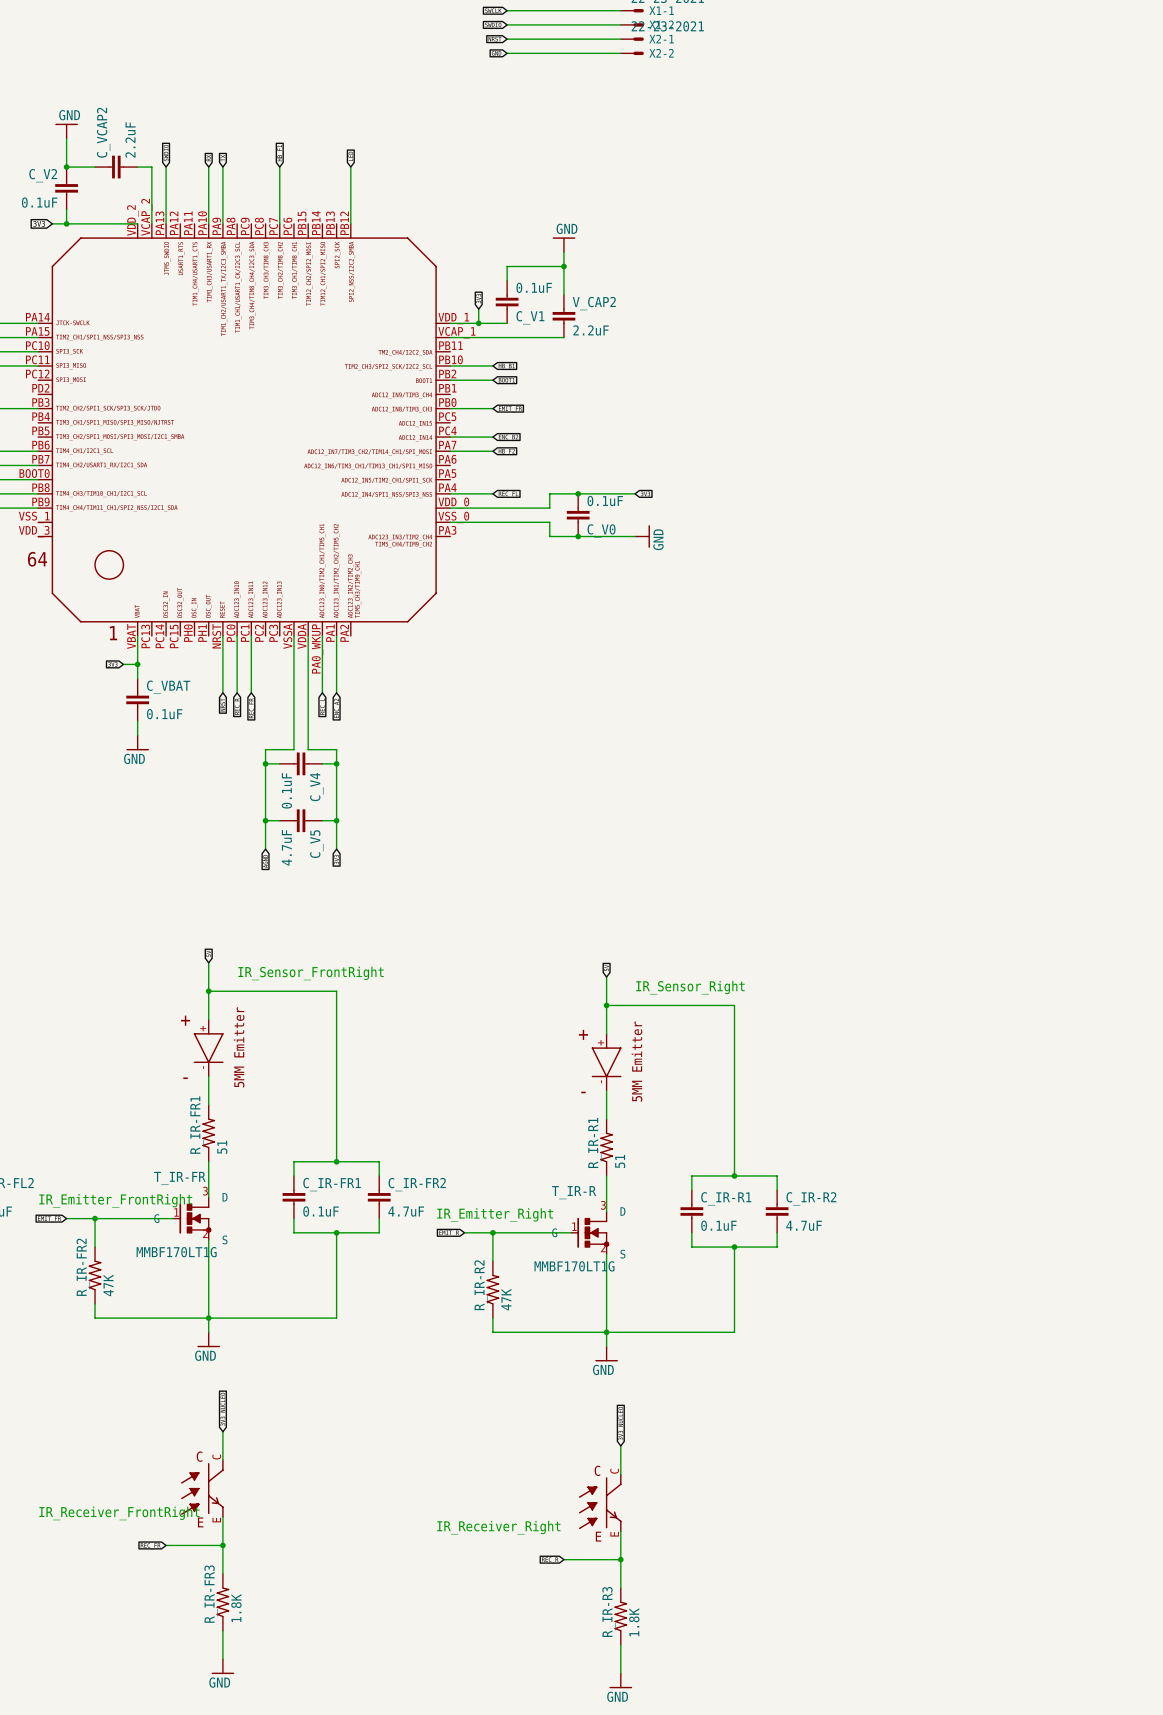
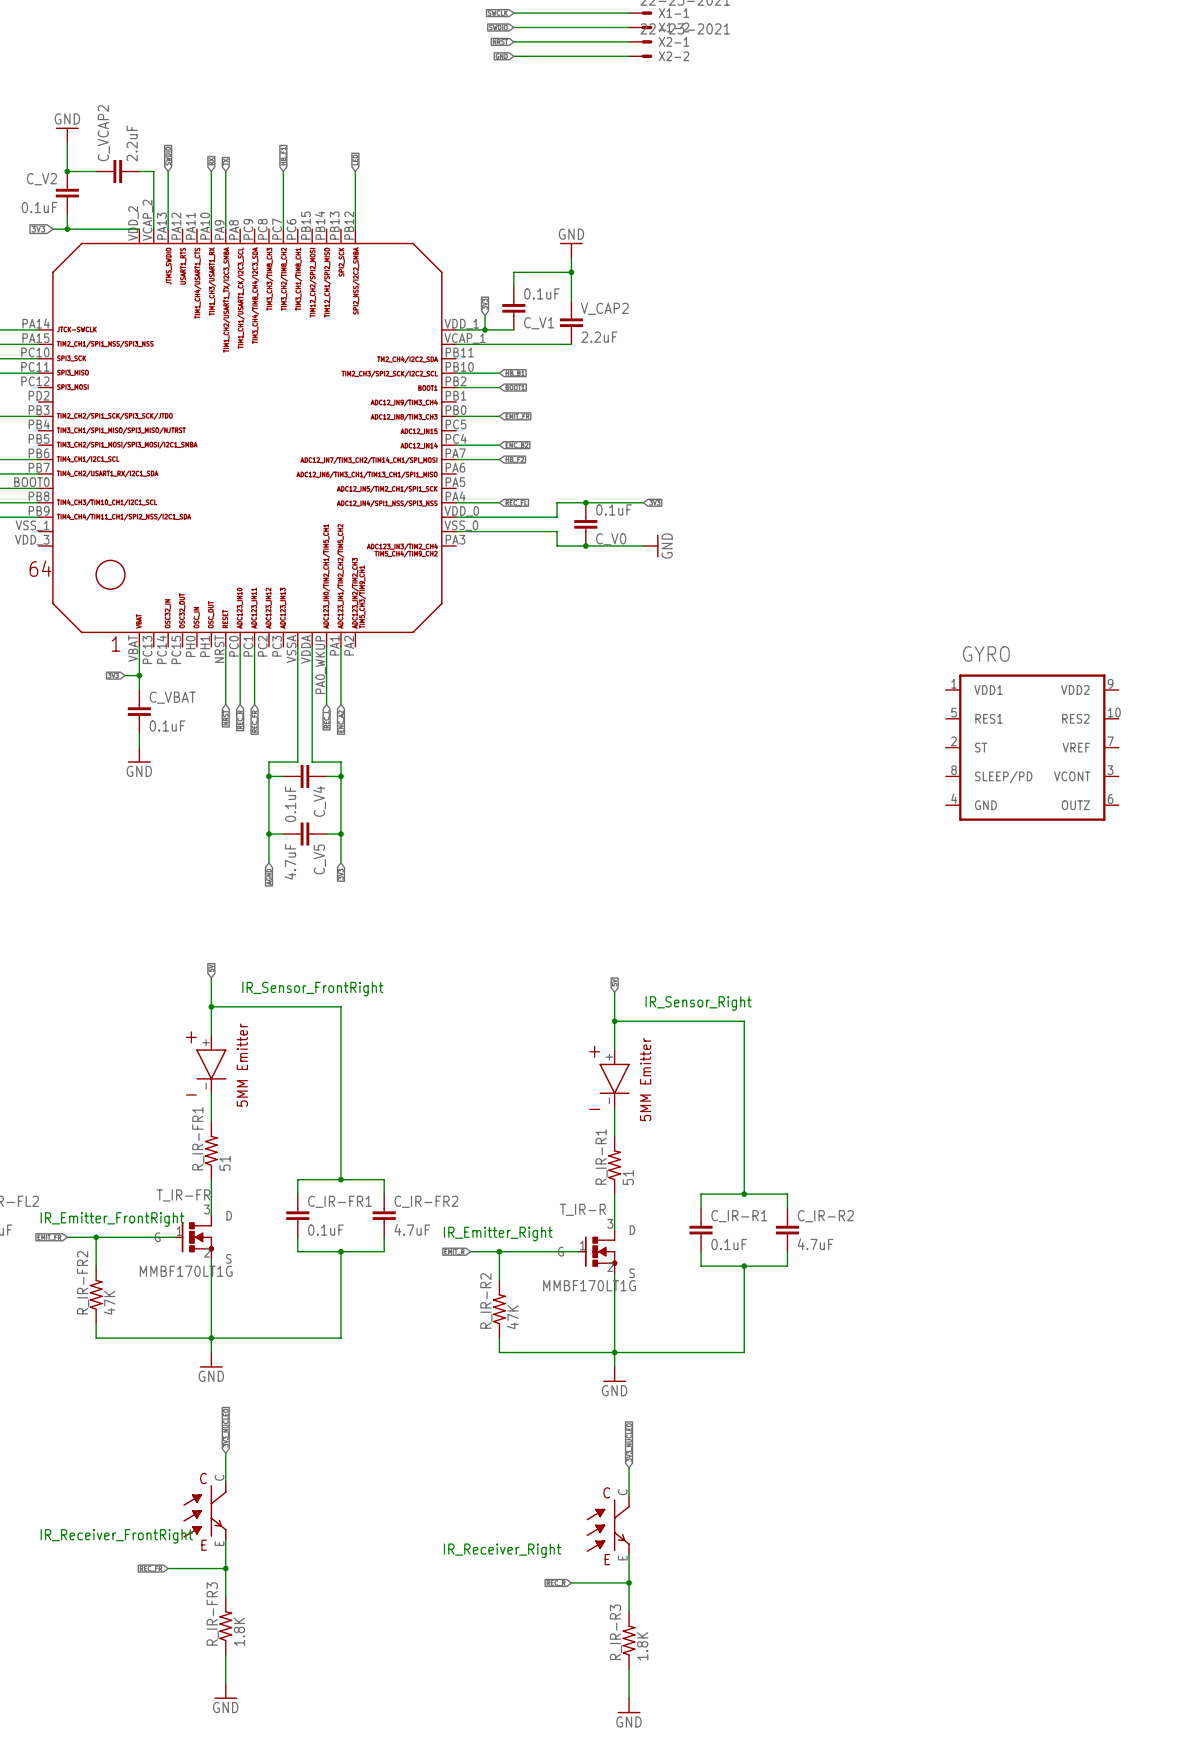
GYRO: none -> (1032, 747)

